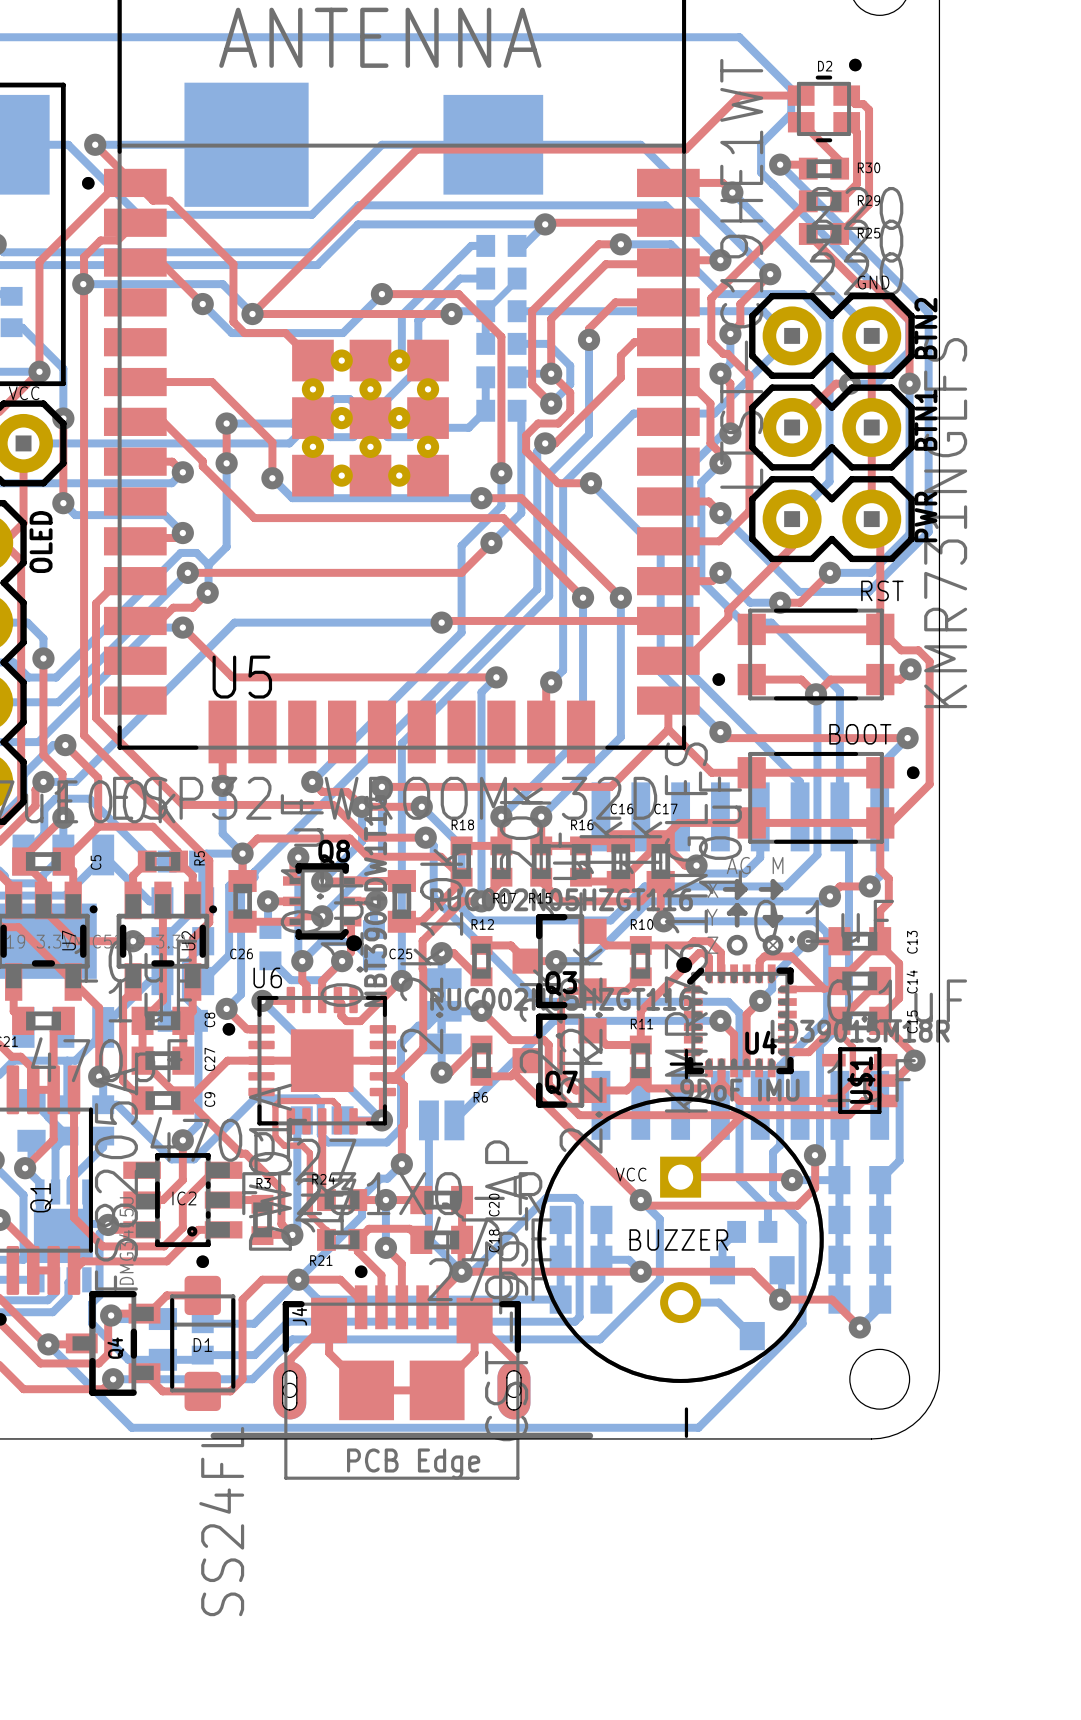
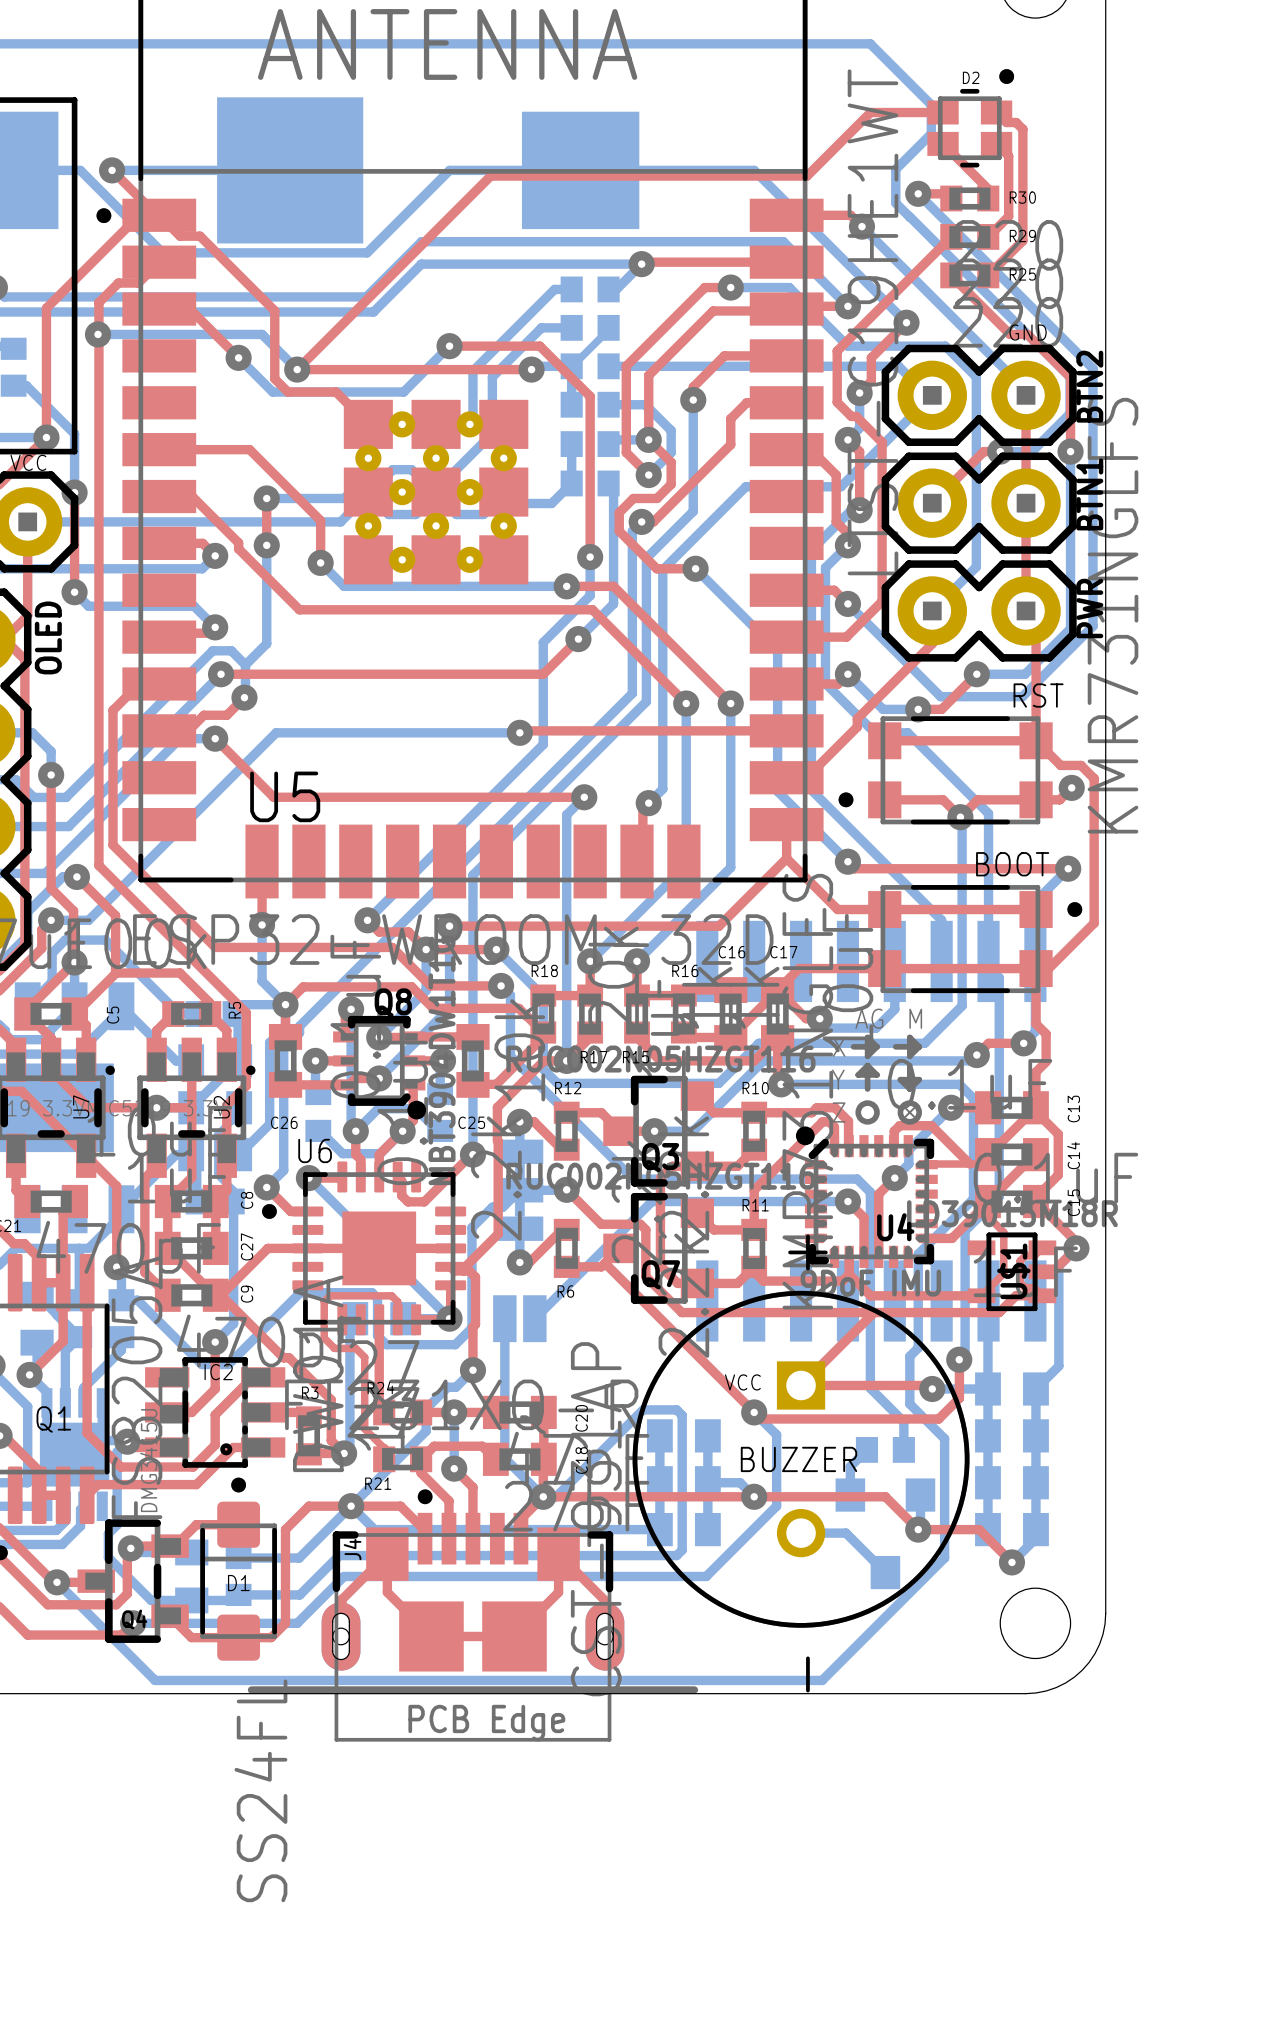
Q1 name rotation: 0° (41, 1197) -> 90° clockwise (53, 1419)
IC2 name position: IC2 (184, 1198) -> IC2 (218, 1372)
Q4 name rotation: 0° (115, 1348) -> 90° clockwise (134, 1619)

